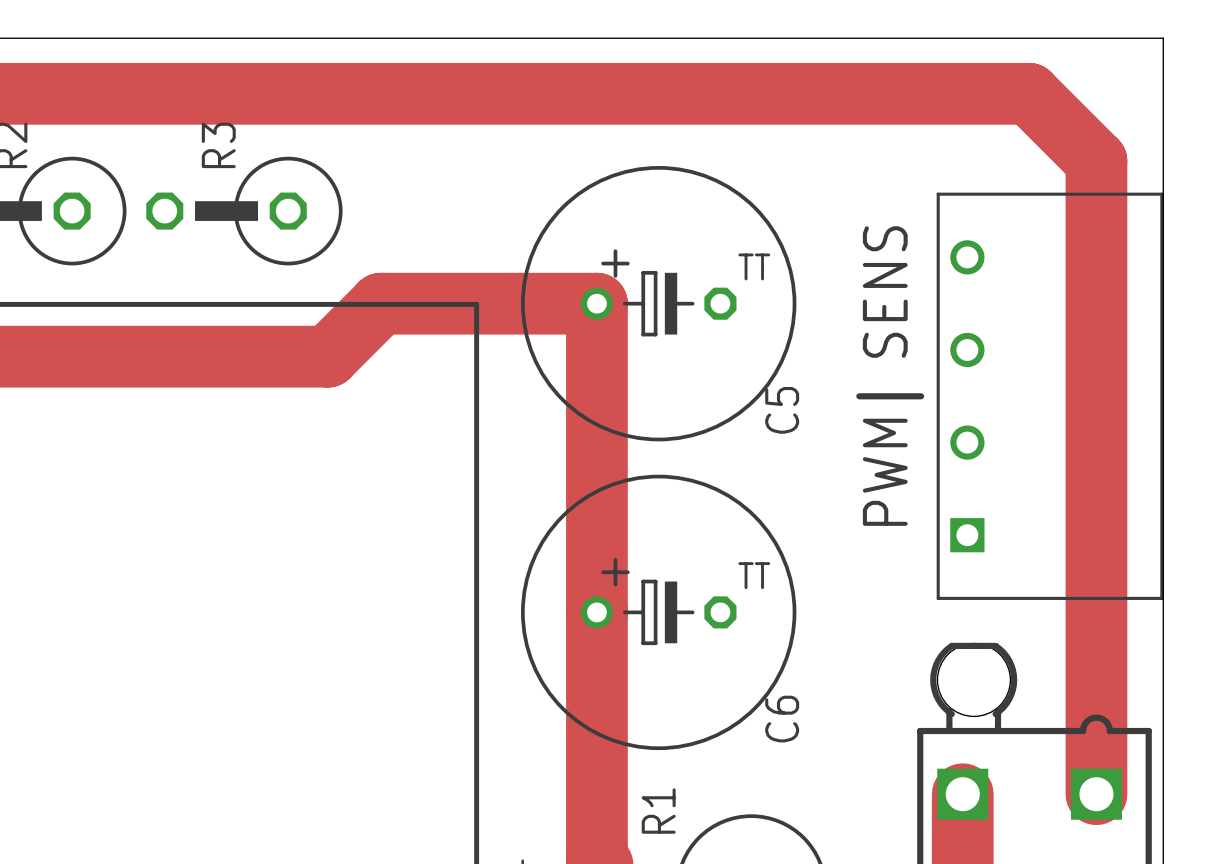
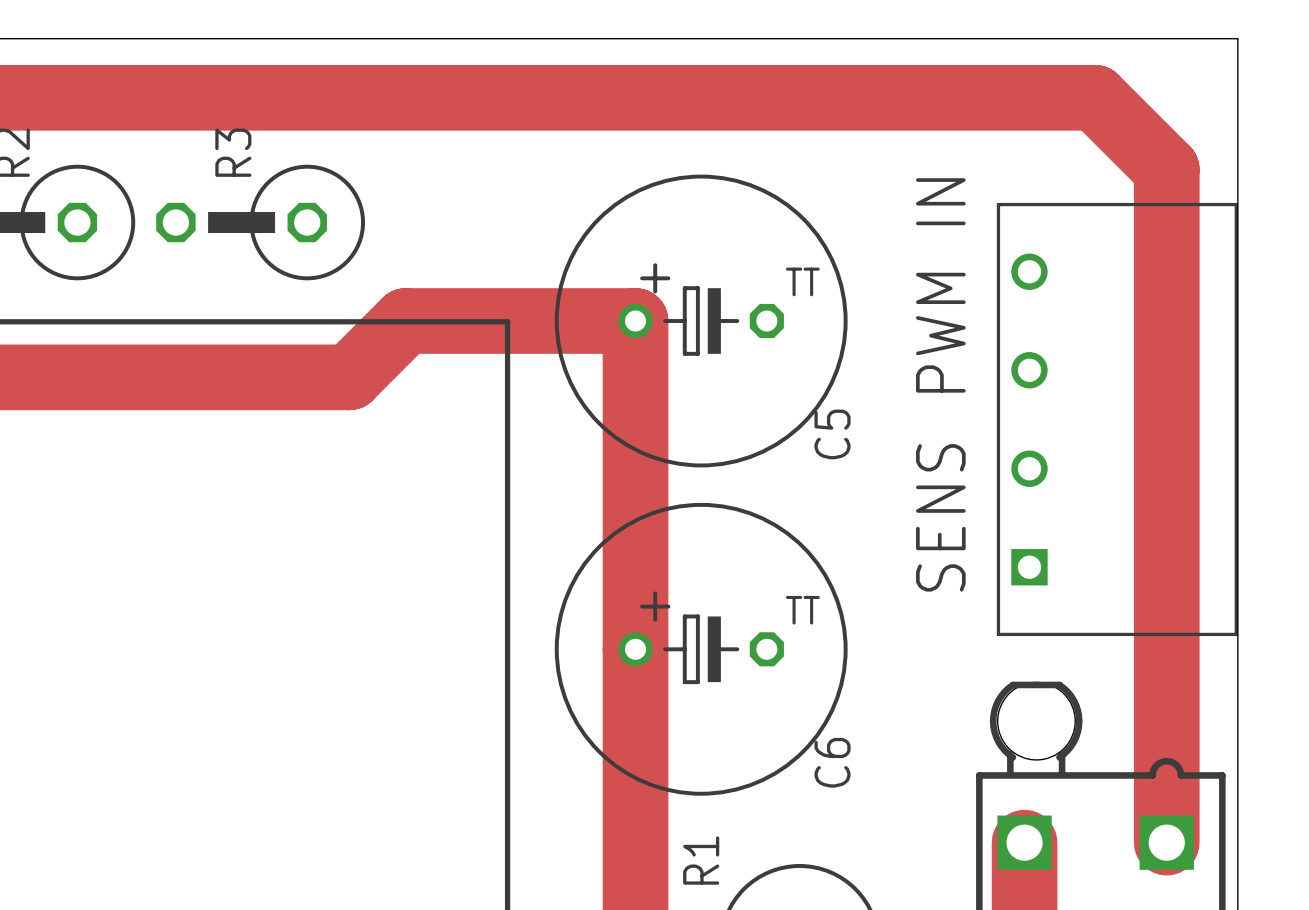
text: SENS (885, 292) -> PWM IN (940, 285)
line: (859, 396) (921, 396) -> none
text: PWM (885, 472) -> none
text: none -> SENS (940, 517)

